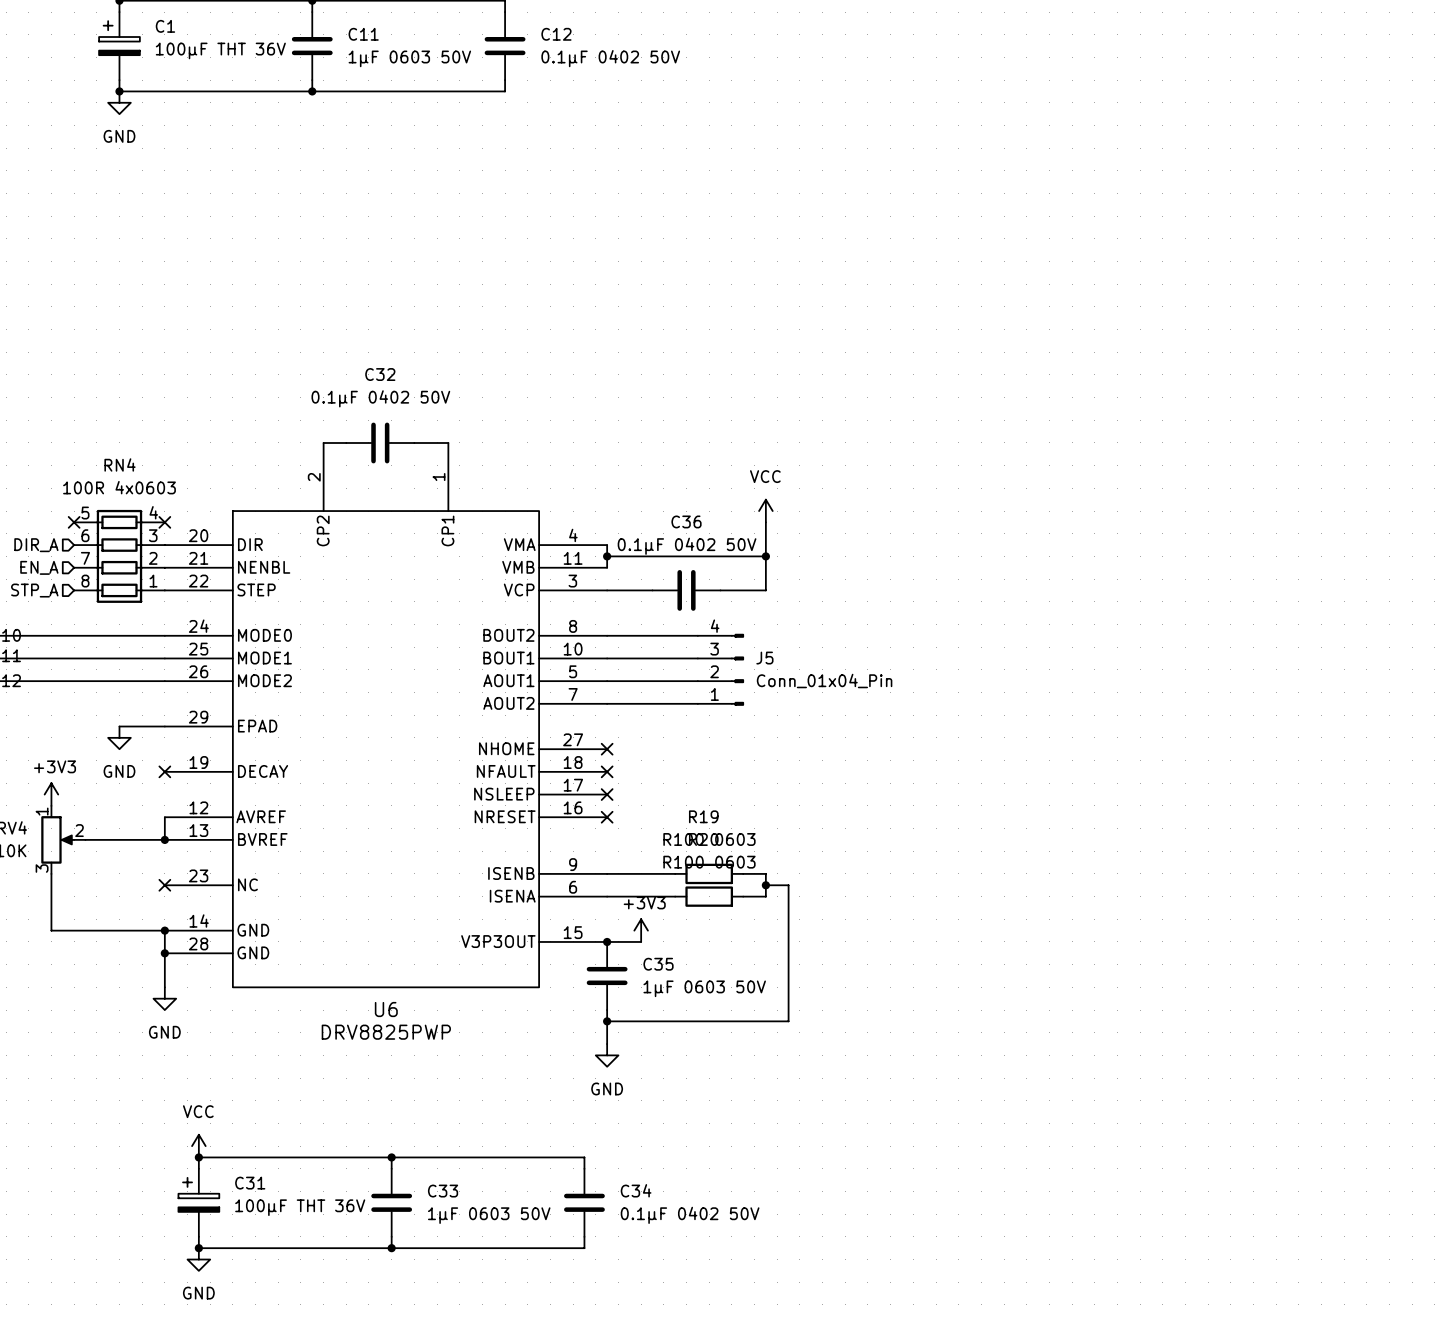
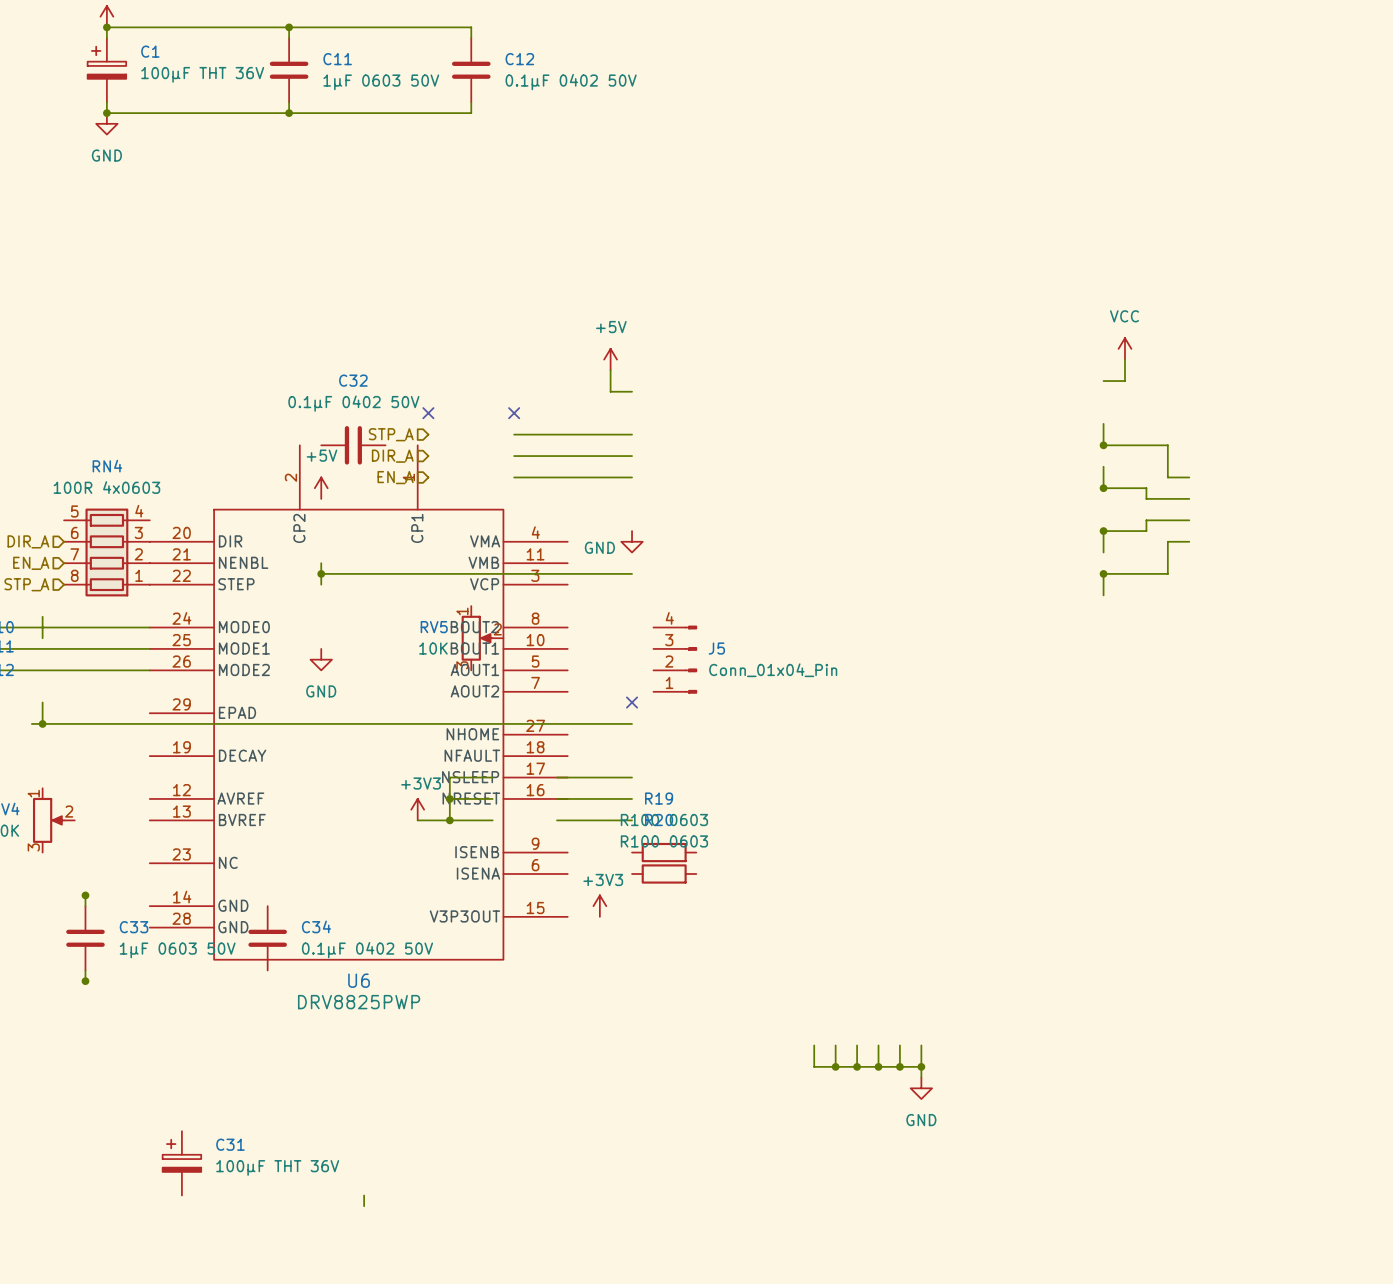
power symbol: none -> VCC (1124, 348)
power symbol: none -> +5V (610, 359)
wire: none -> (1124, 359) (1124, 381) (1103, 381)
wire: none -> (610, 370) (610, 391) (632, 391)
no-connect mark: none -> (428, 413)
no-connect mark: none -> (514, 413)
wire: none -> (1103, 423) (1103, 445) (1167, 445) (1167, 477) (1189, 477)
hierarchical label: none -> STP_A (391, 434)
wire: none -> (514, 434) (632, 434)
wire: (323, 442) (346, 442) -> none
wire: (414, 442) (448, 442) -> none
junction: none -> (1103, 445)
hierarchical label: none -> DIR_A (392, 456)
wire: none -> (514, 456) (632, 456)
wire: none -> (1103, 466) (1103, 488) (1146, 488) (1146, 498) (1189, 498)
hierarchical label: none -> EN_A (395, 477)
wire: none -> (514, 477) (632, 477)
power symbol: none -> +5V (321, 488)
junction: none -> (1103, 488)
power symbol: VCC (765, 511) -> none
no-connect mark: (74, 522) -> none
no-connect mark: (164, 522) -> none
wire: (765, 522) (765, 590) (720, 590) -> none
wire: none -> (1189, 520) (1146, 520) (1146, 531) (1103, 531) (1103, 552)
junction: none -> (1103, 531)
wire: (607, 545) (607, 567) -> none
power symbol: none -> GND (632, 541)
wire: none -> (1189, 541) (1167, 541) (1167, 573) (1103, 573) (1103, 595)
wire: (607, 556) (765, 556) -> none
junction: (607, 556) -> none
junction: (765, 556) -> none
wire: none -> (321, 563) (321, 584)
wire: none -> (321, 573) (632, 573)
junction: none -> (321, 573)
junction: none -> (1103, 573)
wire: (607, 590) (652, 590) -> none
C36: 0.1μF 0402 50V (686, 590) -> none
wire: none -> (42, 616) (42, 638)
wire: (607, 635) (697, 635) -> none
RV5: none -> 10K (482, 638)
wire: (607, 658) (697, 658) -> none
power symbol: none -> GND (321, 659)
wire: (607, 681) (697, 681) -> none
wire: (607, 703) (697, 703) -> none
wire: none -> (42, 702) (42, 723)
no-connect mark: none -> (632, 702)
wire: (119, 726) (164, 726) -> none
wire: none -> (31, 723) (632, 723)
junction: none -> (42, 723)
power symbol: GND (119, 737) -> none
no-connect mark: (607, 749) -> none
no-connect mark: (164, 771) -> none
no-connect mark: (607, 771) -> none
power symbol: +3V3 (51, 794) -> none
wire: none -> (492, 777) (449, 777) (449, 820)
wire: none -> (557, 777) (632, 777)
no-connect mark: (607, 794) -> none
wire: (164, 817) (164, 839) (85, 839) -> none
wire: none -> (449, 798) (492, 798)
junction: none -> (449, 798)
wire: none -> (557, 798) (632, 798)
no-connect mark: (607, 817) -> none
power symbol: none -> +3V3 (417, 809)
junction: (164, 839) -> none
wire: none -> (417, 820) (492, 820)
junction: none -> (449, 820)
wire: none -> (557, 820) (632, 820)
wire: (51, 873) (51, 930) (164, 930) (164, 987) -> none
wire: (607, 873) (675, 873) -> none
wire: (743, 873) (765, 873) (765, 896) (743, 896) -> none
no-connect mark: (164, 885) -> none
wire: (765, 885) (788, 885) (788, 1021) (607, 1021) -> none
junction: (765, 885) -> none
wire: (607, 896) (675, 896) -> none
wire: none -> (85, 895) (85, 906)
junction: none -> (85, 895)
junction: (164, 930) -> none
wire: (607, 941) (641, 941) -> none
junction: (607, 941) -> none
junction: (164, 953) -> none
C35: 1μF 0603 50V (607, 976) -> none
wire: none -> (85, 970) (85, 981)
power symbol: GND (164, 998) -> none
junction: none -> (85, 981)
wire: (607, 1010) (607, 1044) -> none
junction: (607, 1021) -> none
power symbol: GND (607, 1055) -> none
wire: none -> (814, 1045) (814, 1066) (921, 1066)
wire: none -> (835, 1045) (835, 1066)
wire: none -> (857, 1045) (857, 1066)
wire: none -> (878, 1045) (878, 1066)
wire: none -> (899, 1045) (899, 1066)
wire: none -> (921, 1045) (921, 1077)
junction: none -> (835, 1066)
junction: none -> (857, 1066)
junction: none -> (878, 1066)
junction: none -> (899, 1066)
junction: none -> (921, 1066)
power symbol: none -> GND (921, 1088)
power symbol: VCC (198, 1146) -> none
junction: (198, 1157) -> none
wire: (391, 1157) (391, 1168) -> none
junction: (391, 1157) -> none
wire: (198, 1168) (198, 1157) (584, 1157) (584, 1168) -> none
C33 position: (391, 1202) -> (85, 938)
C34 position: (584, 1202) -> (267, 938)
wire: (198, 1236) (198, 1248) (584, 1248) (584, 1236) -> none
junction: (198, 1248) -> none
junction: (391, 1248) -> none
power symbol: GND (198, 1259) -> none

